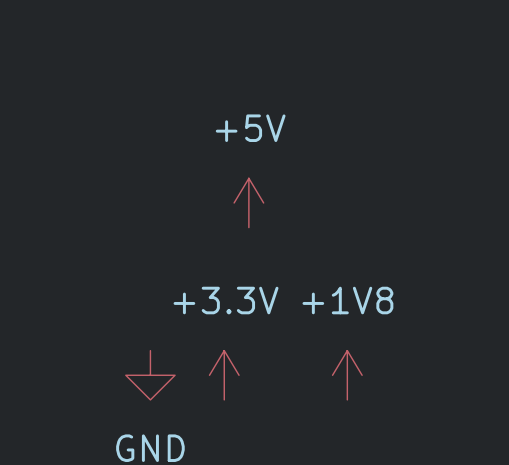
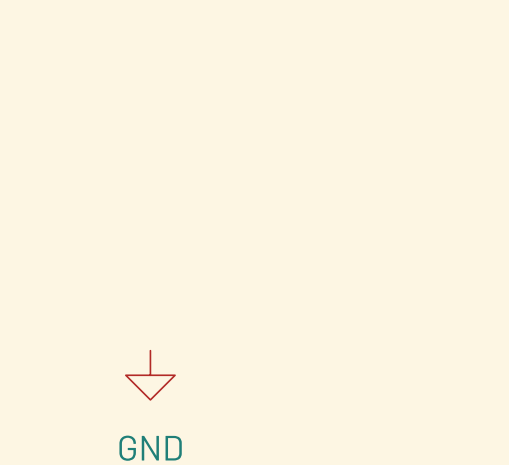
power symbol: +5V (248, 202) -> none
power symbol: +3.3V (224, 375) -> none
power symbol: +1V8 (347, 375) -> none

